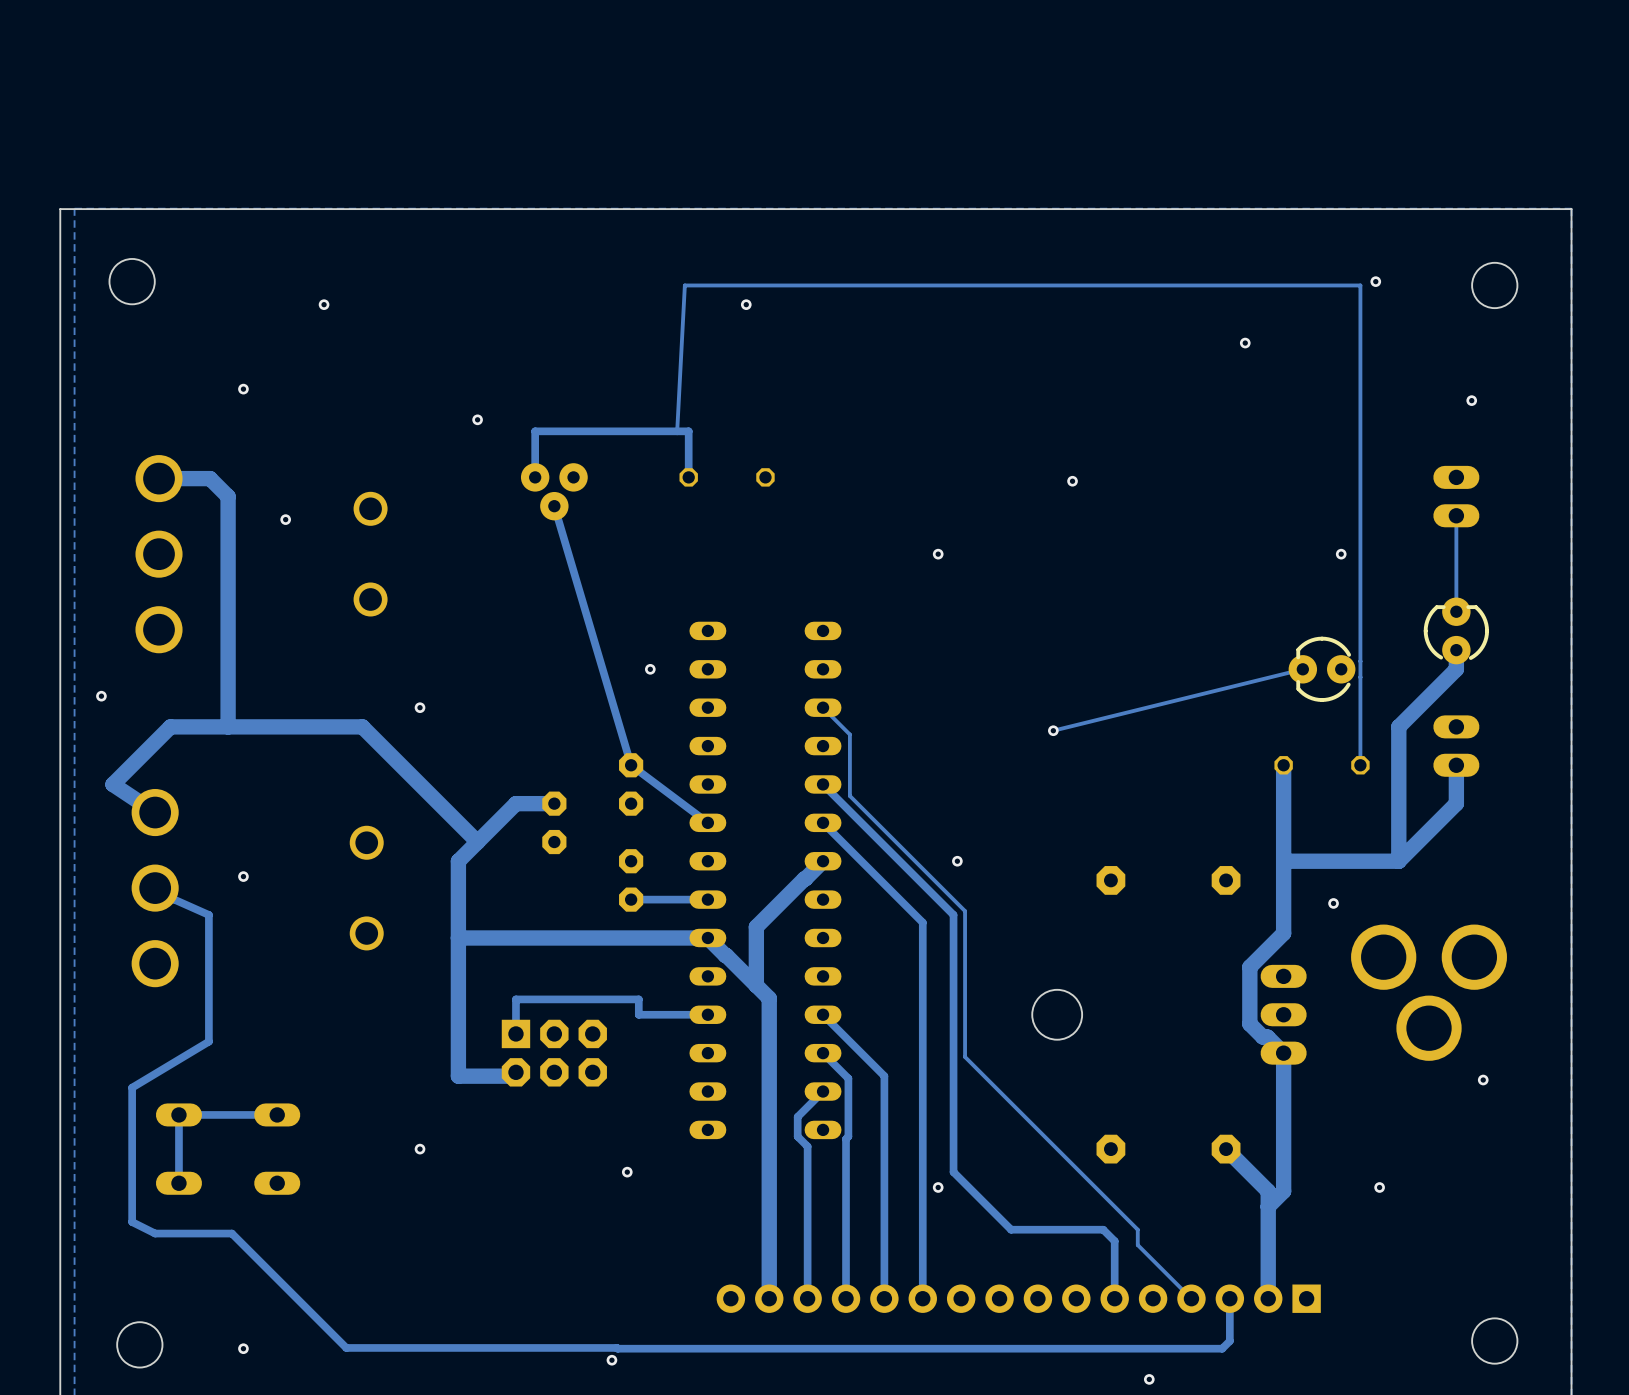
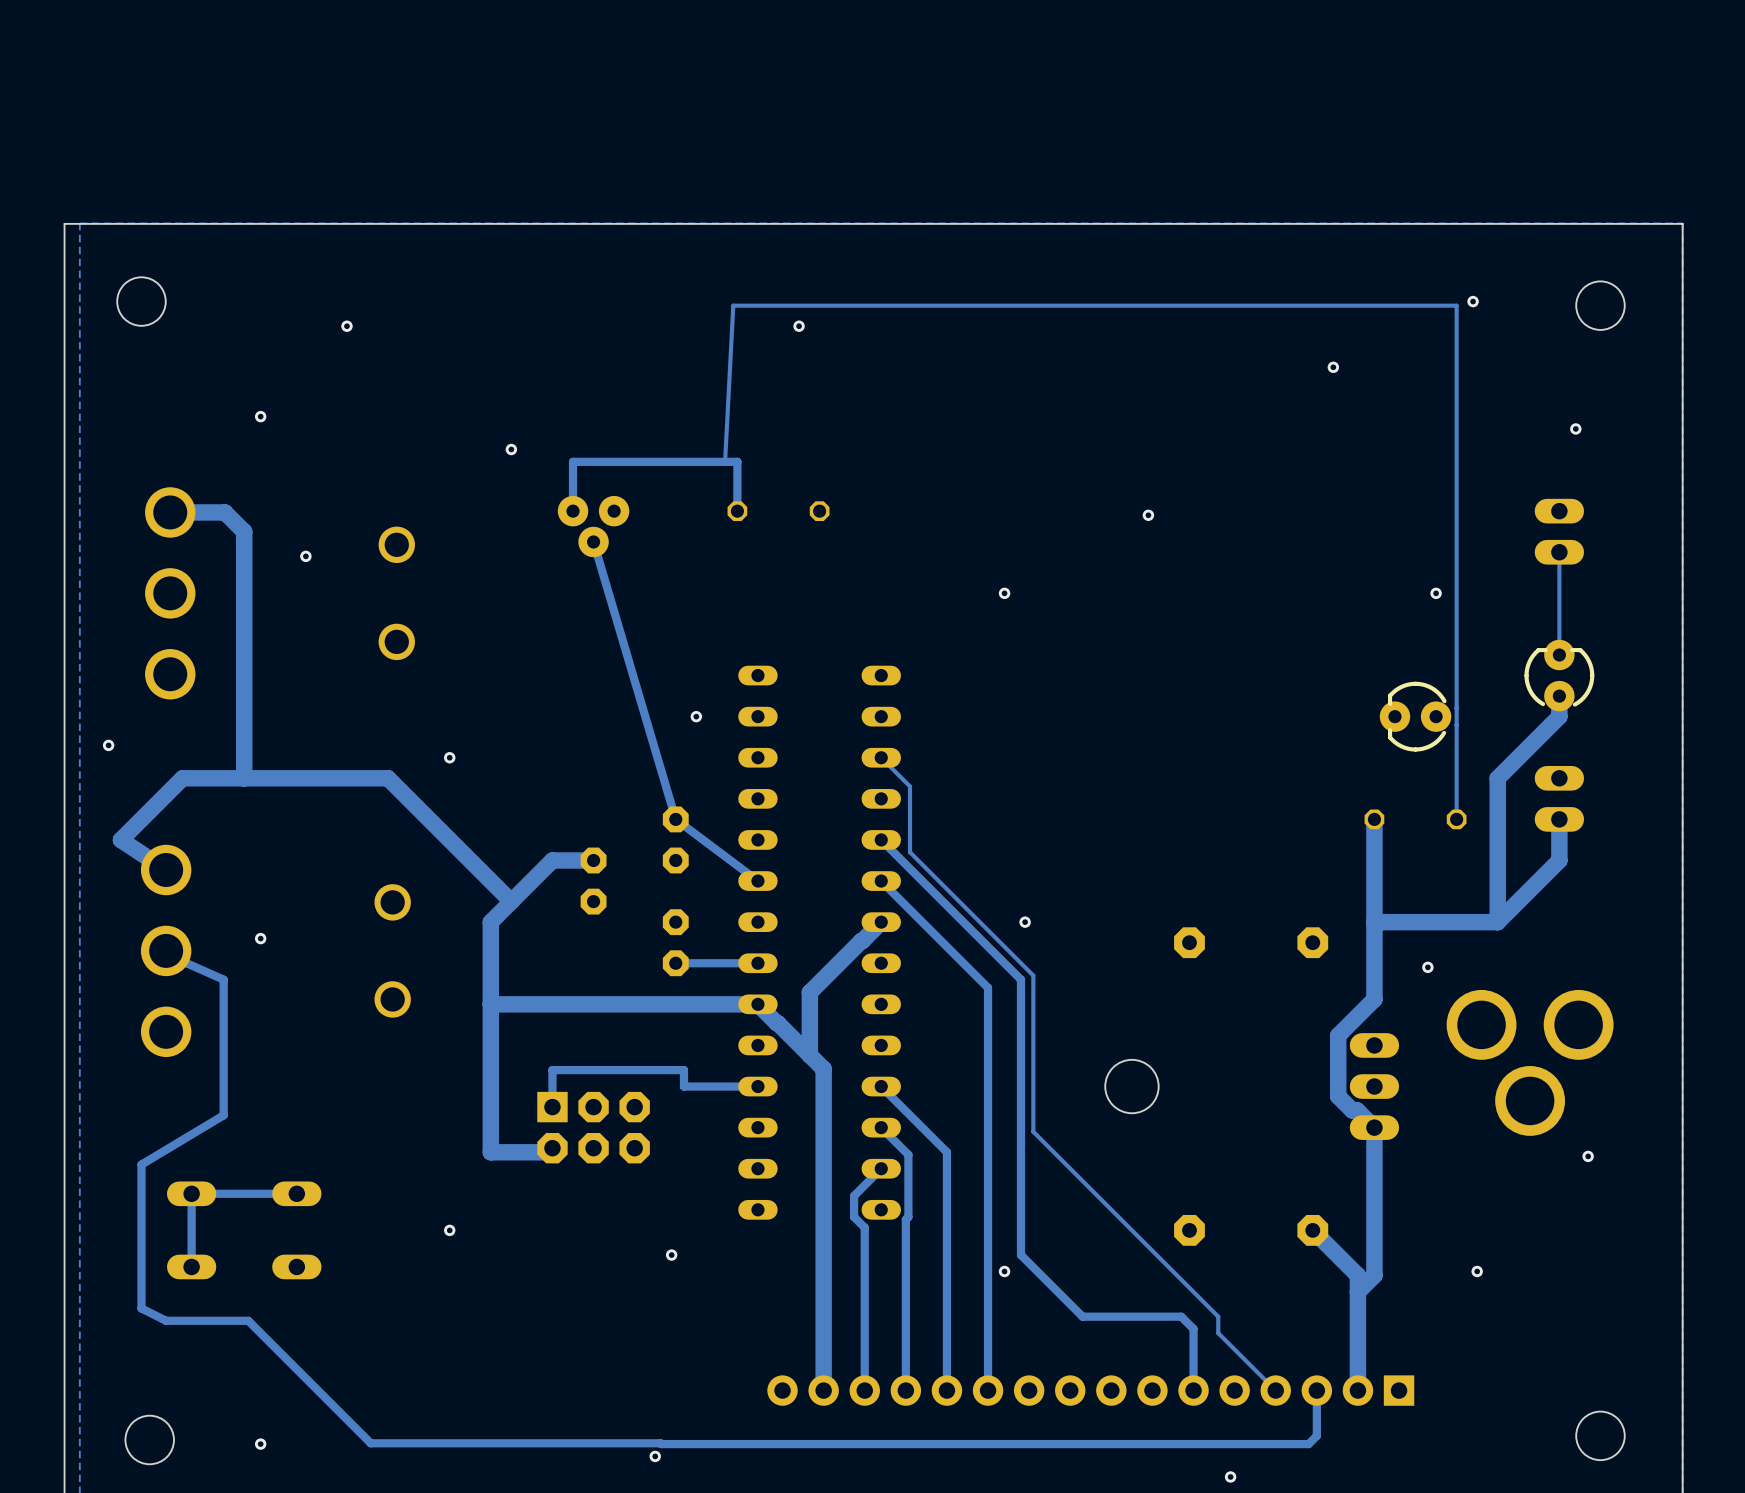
track: (1302, 669) (1053, 730) -> none
via: (1053, 730) -> none

